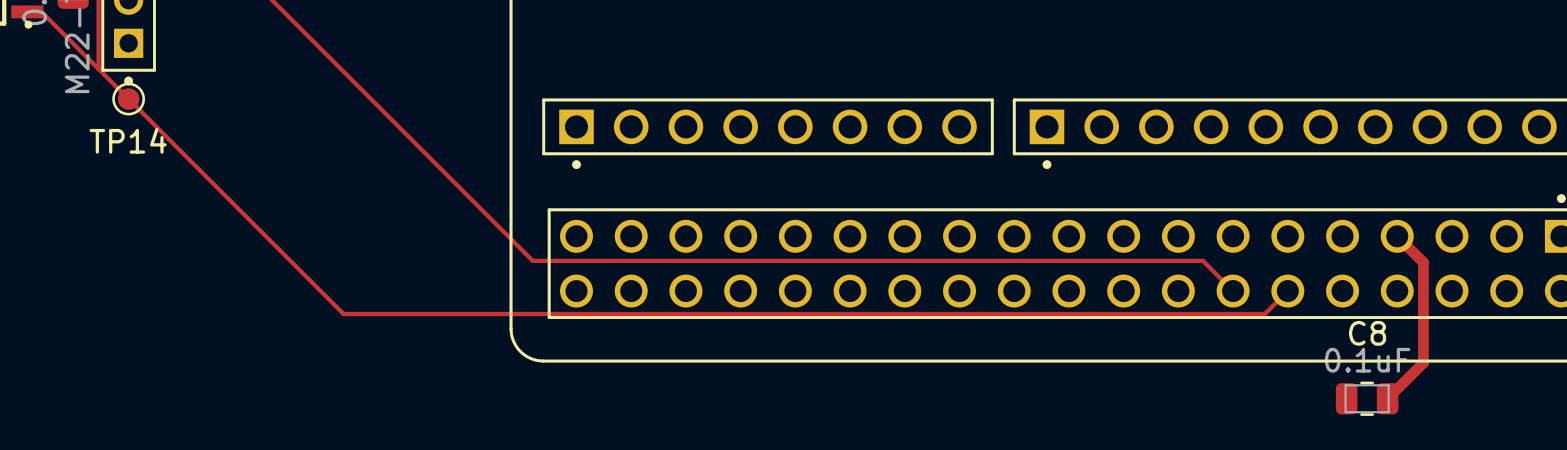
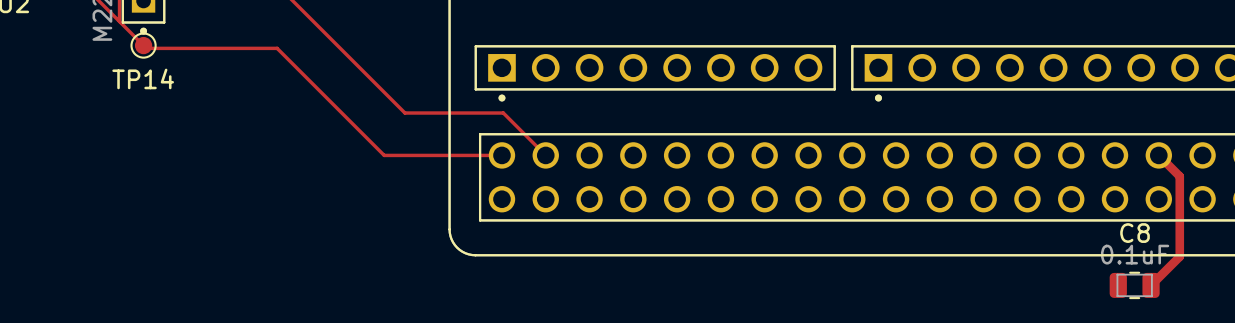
top track: (132, 102) (343, 314) (1264, 314) (1287, 291) -> (146, 48) (277, 48) (384, 155) (501, 155)
top track: (455, 183) (532, 260) (1202, 260) (1233, 291) -> (404, 113) (503, 113) (545, 155)

